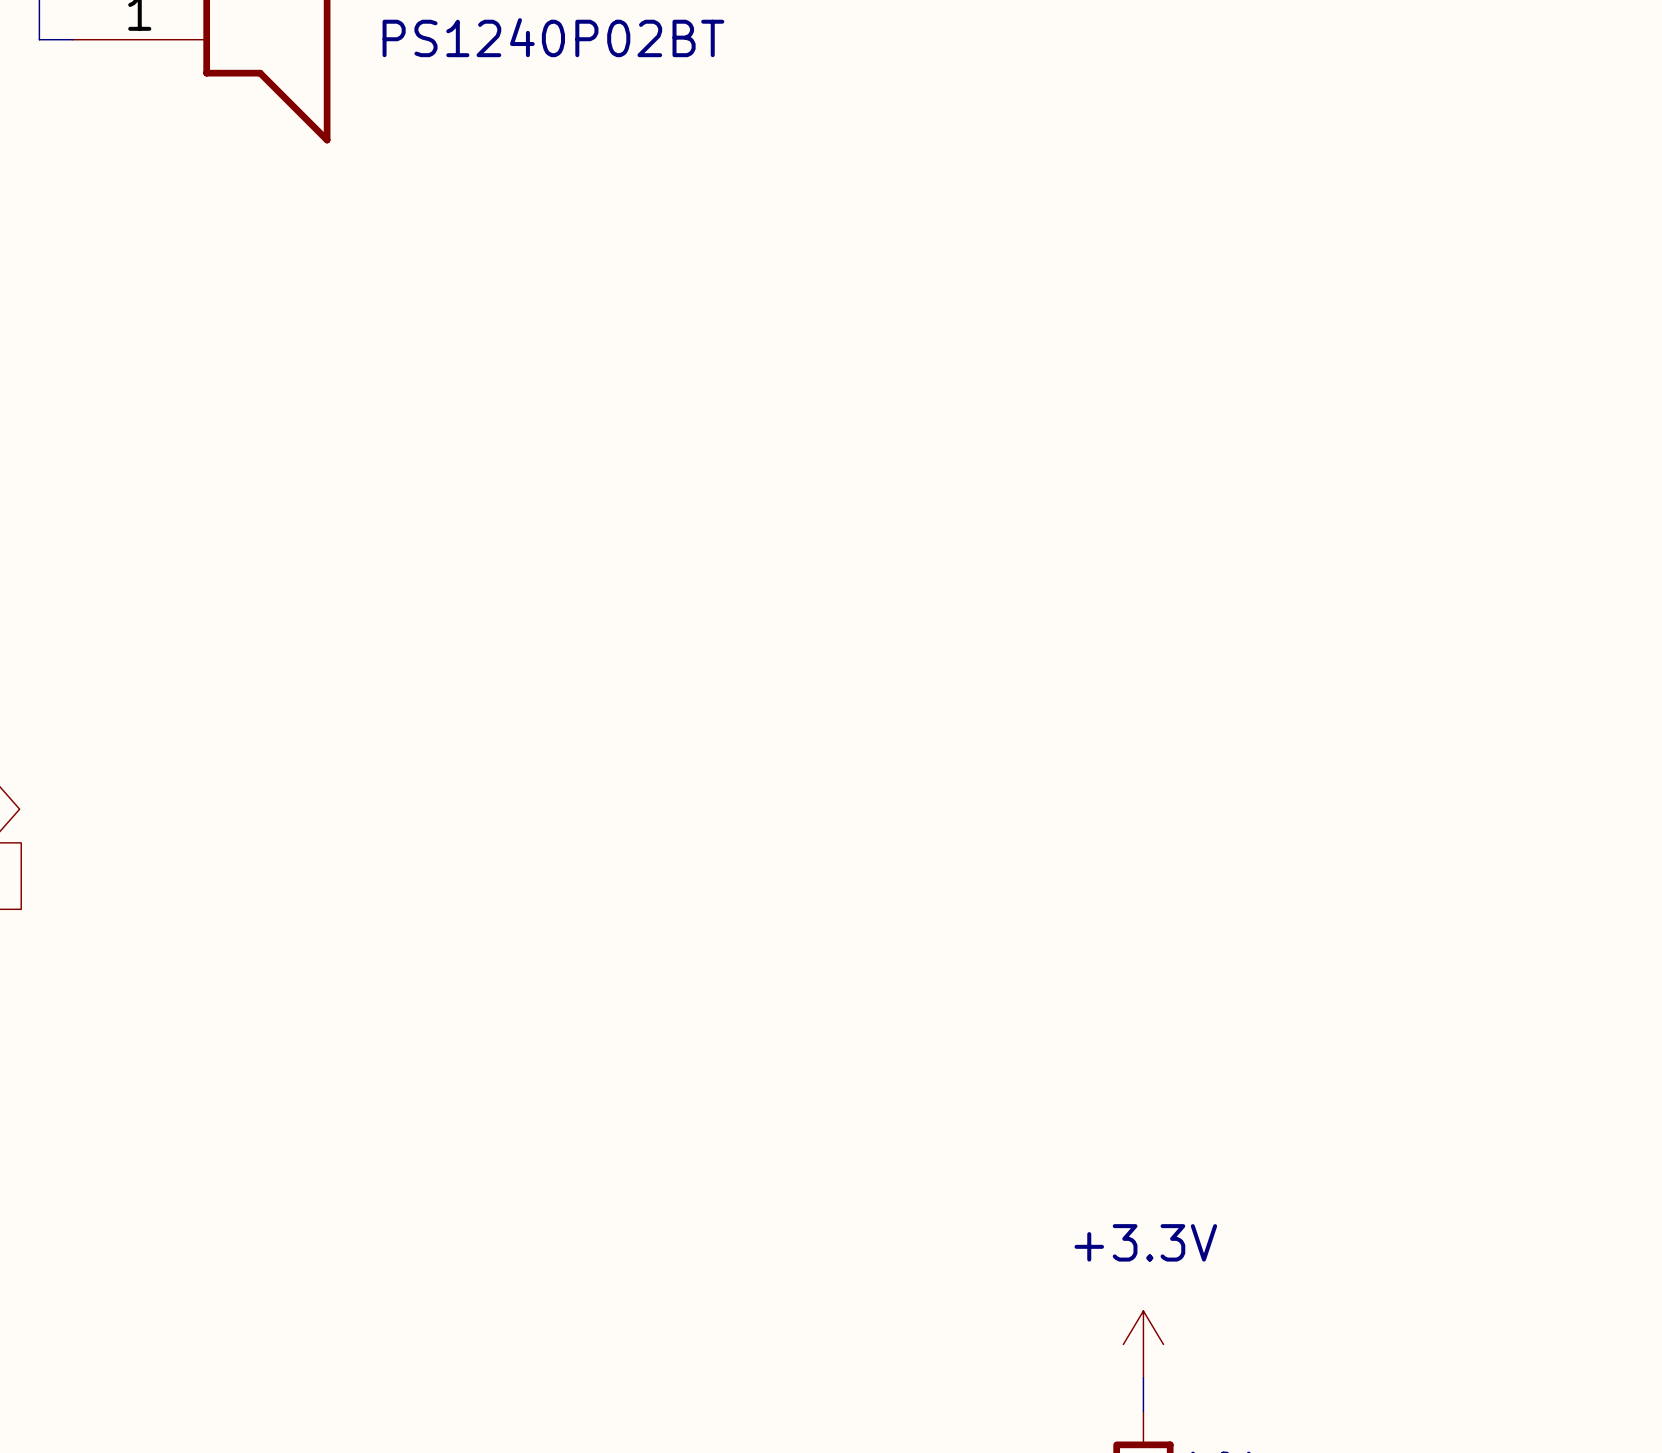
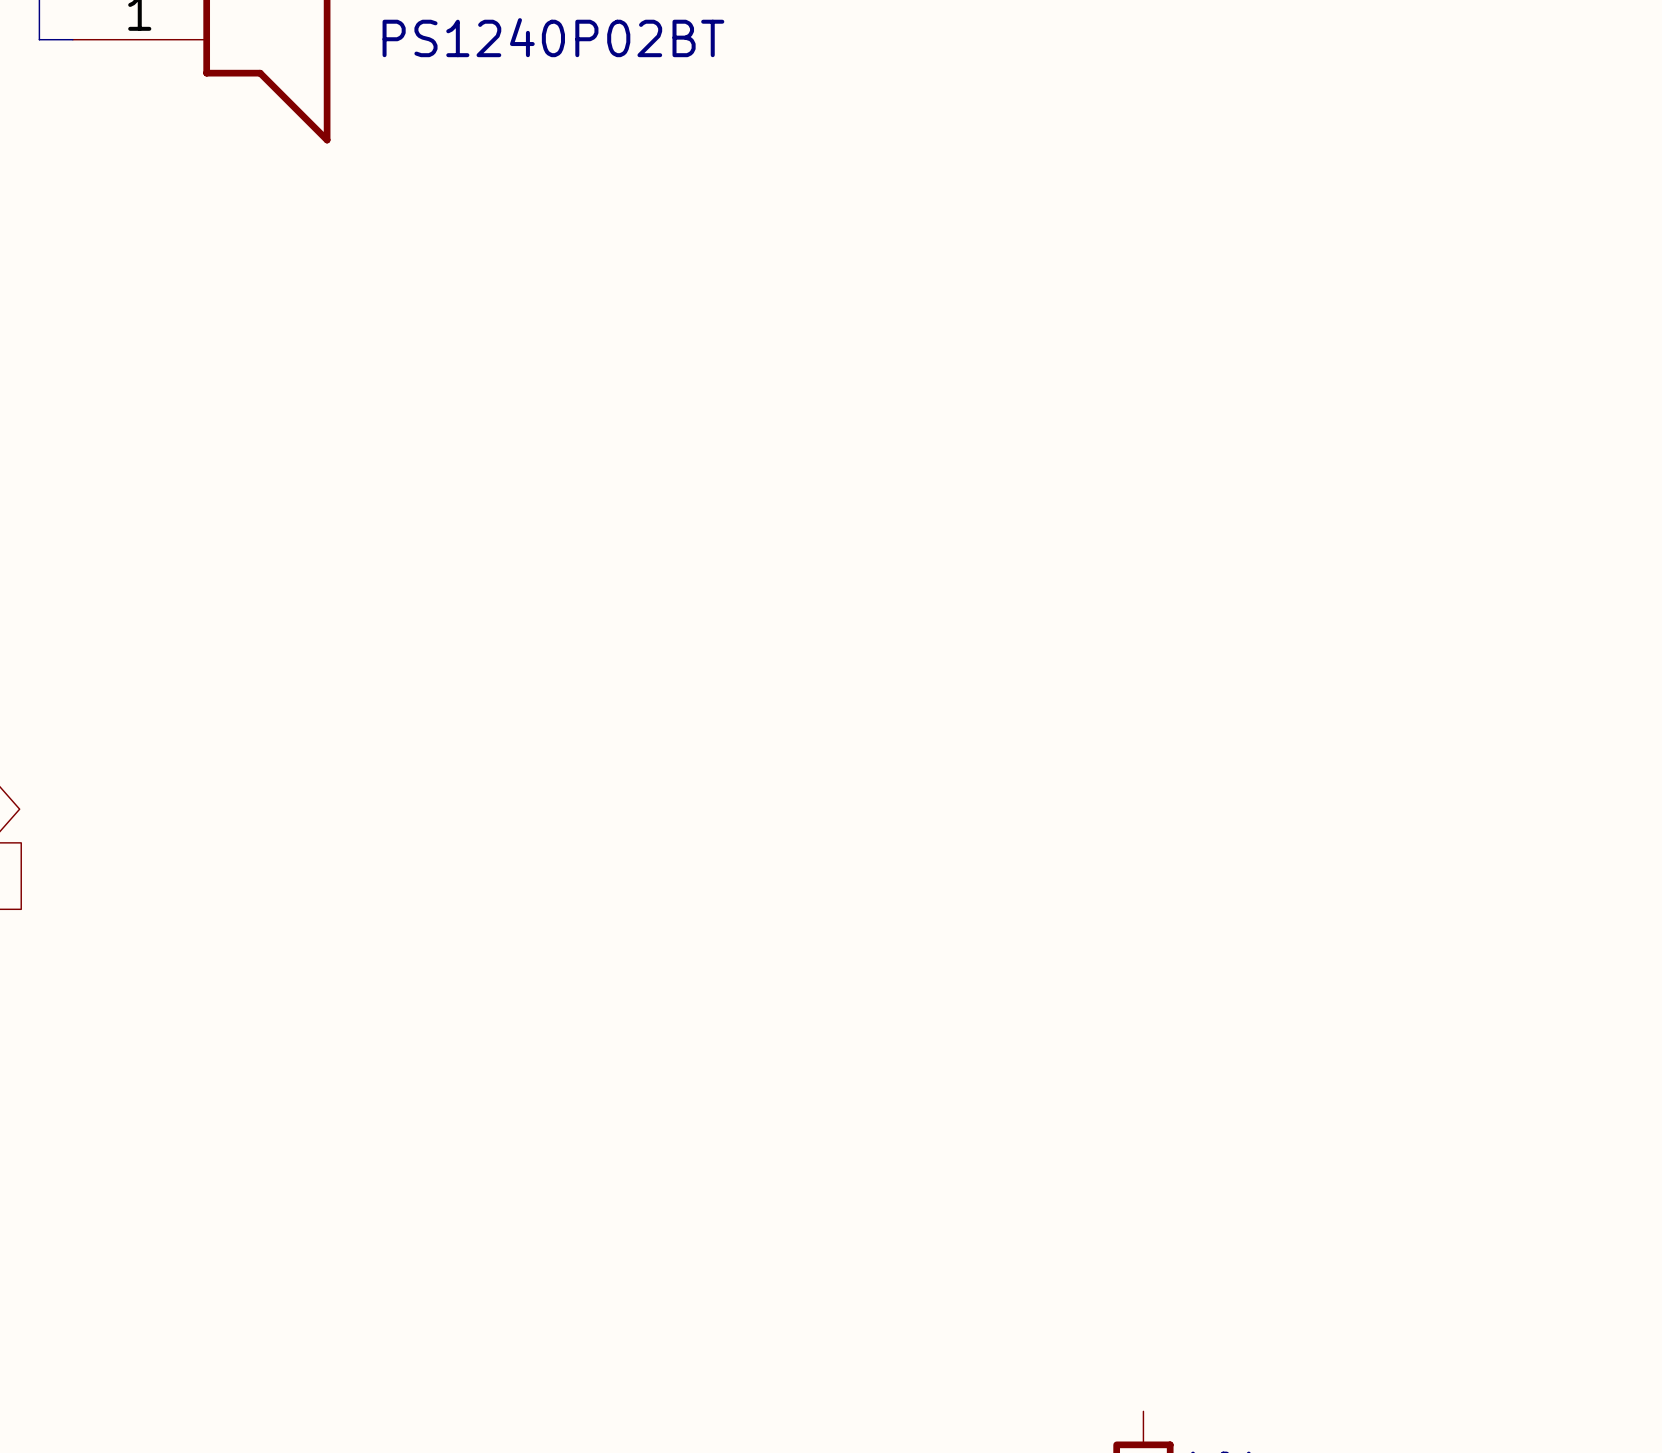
power symbol: +3.3V (1143, 1344) -> none
wire: (1143, 1377) (1143, 1411) -> none

